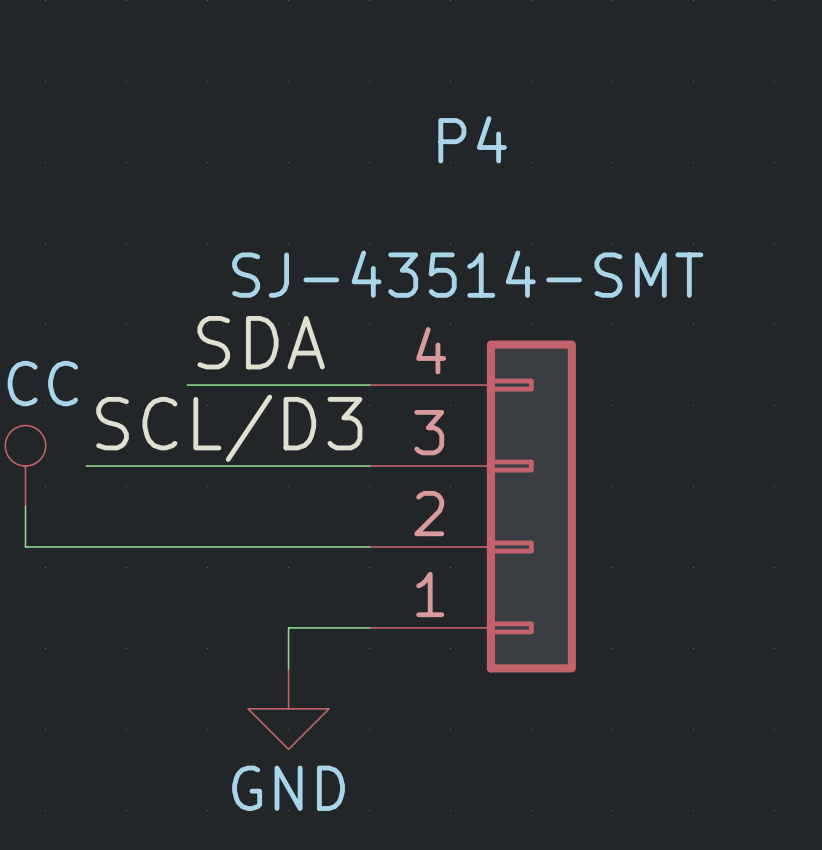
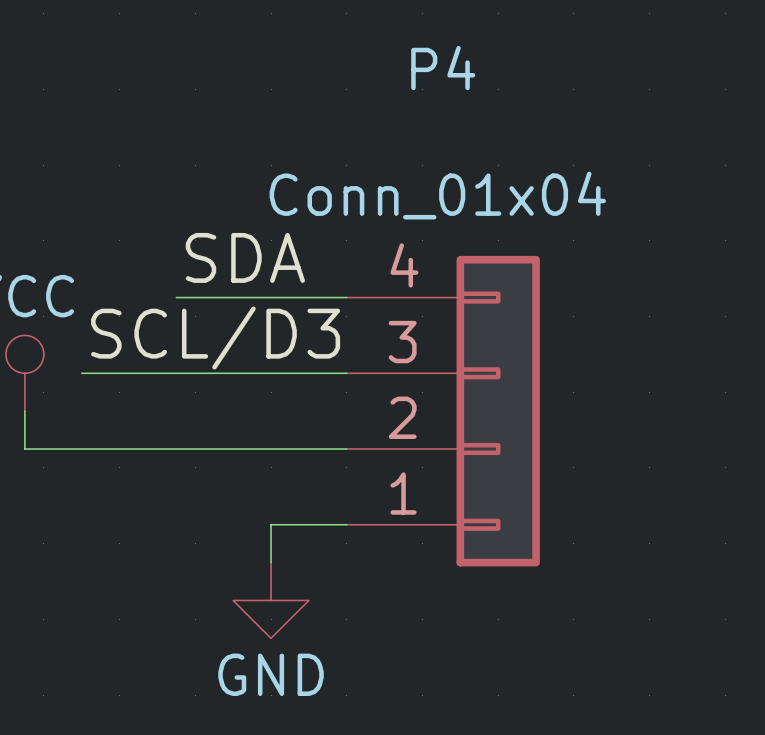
P4 value: SJ-43514-SMT (467, 274) -> Conn_01x04 (437, 195)

